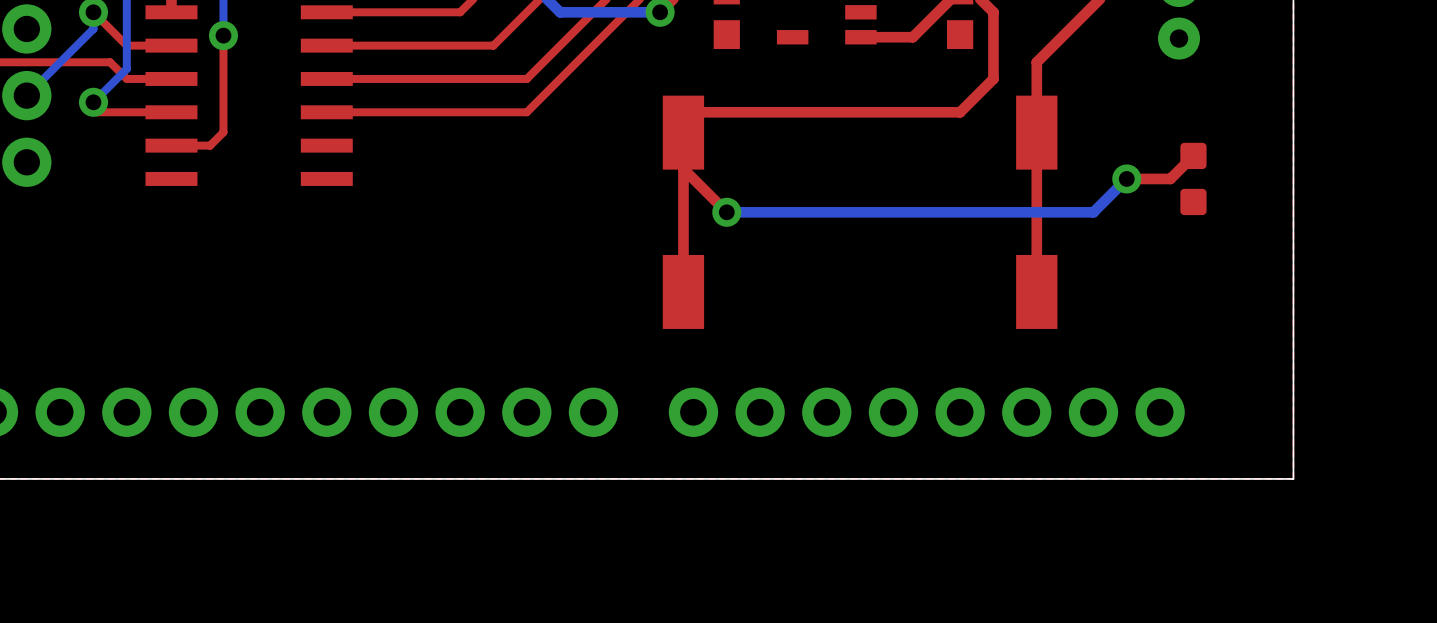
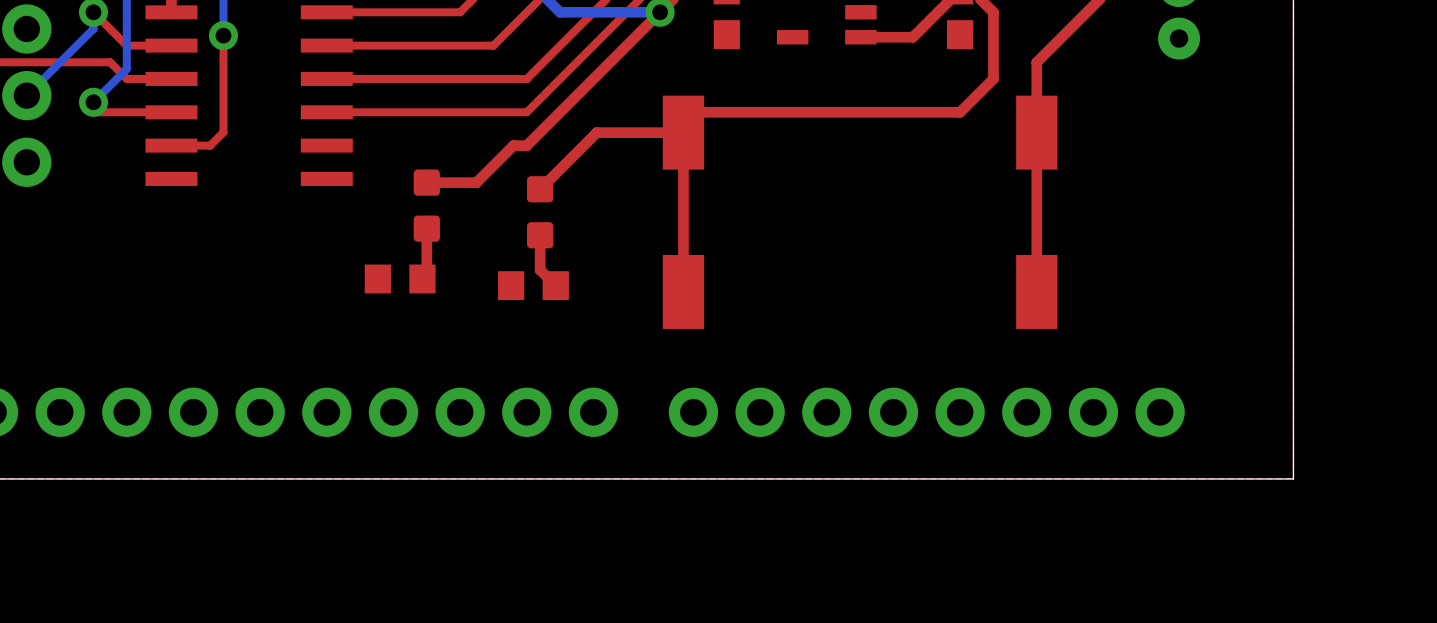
top track: none -> (660, 12) (526, 145) (513, 145) (476, 182) (426, 182)
top track: none -> (683, 132) (596, 132) (540, 189)
top track: (1193, 155) (1170, 178) (1126, 178) -> none
top track: (683, 168) (726, 212) -> none
bottom track: (1126, 178) (1093, 212) (726, 212) -> none
via: (1126, 178) -> none
part: (1193, 178) -> none
part: none -> (426, 205)
part: none -> (540, 212)
via: (726, 212) -> none
top track: none -> (426, 228) (426, 274) (422, 278)
top track: none -> (540, 235) (540, 269) (555, 285)
part: none -> (400, 278)
part: none -> (533, 285)

